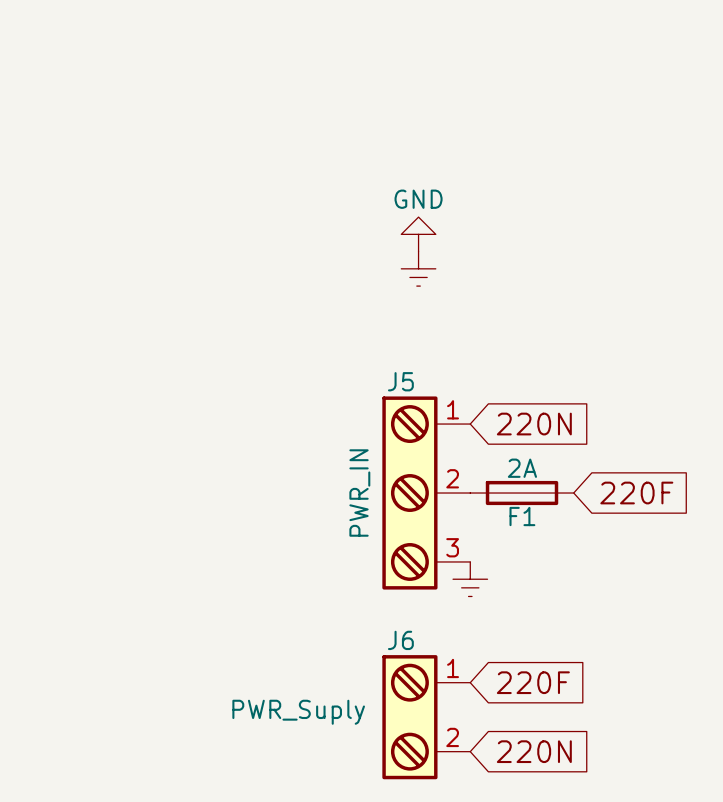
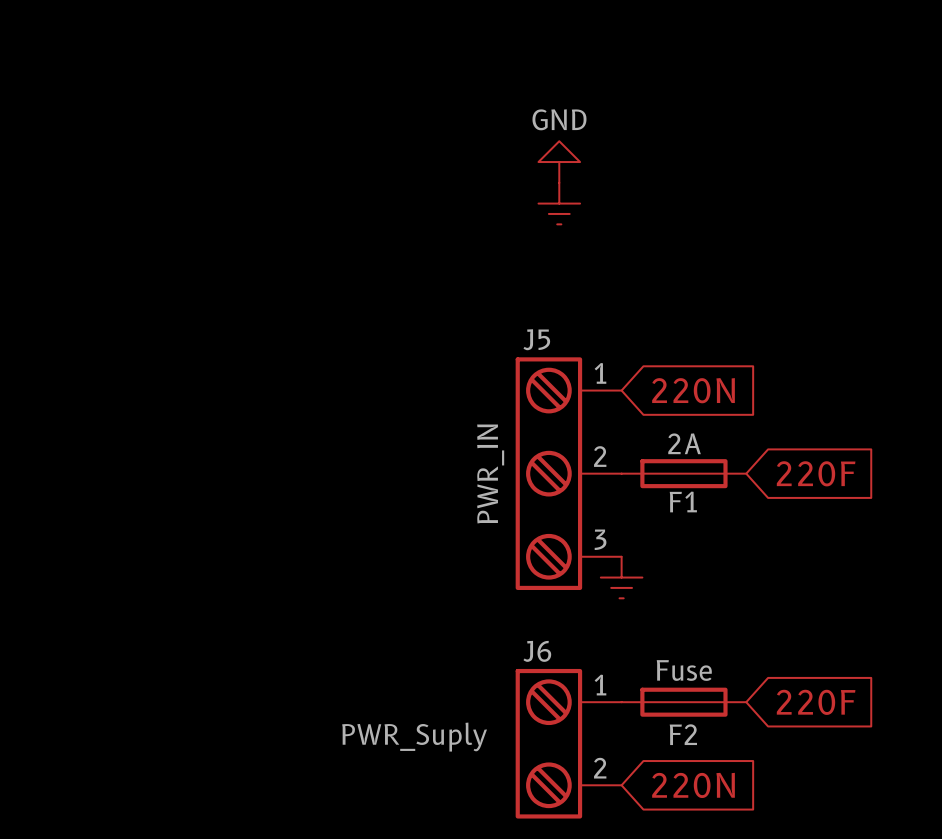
F2: none -> Fuse (683, 702)
global label position: 220F (533, 682) -> 220F (816, 702)

